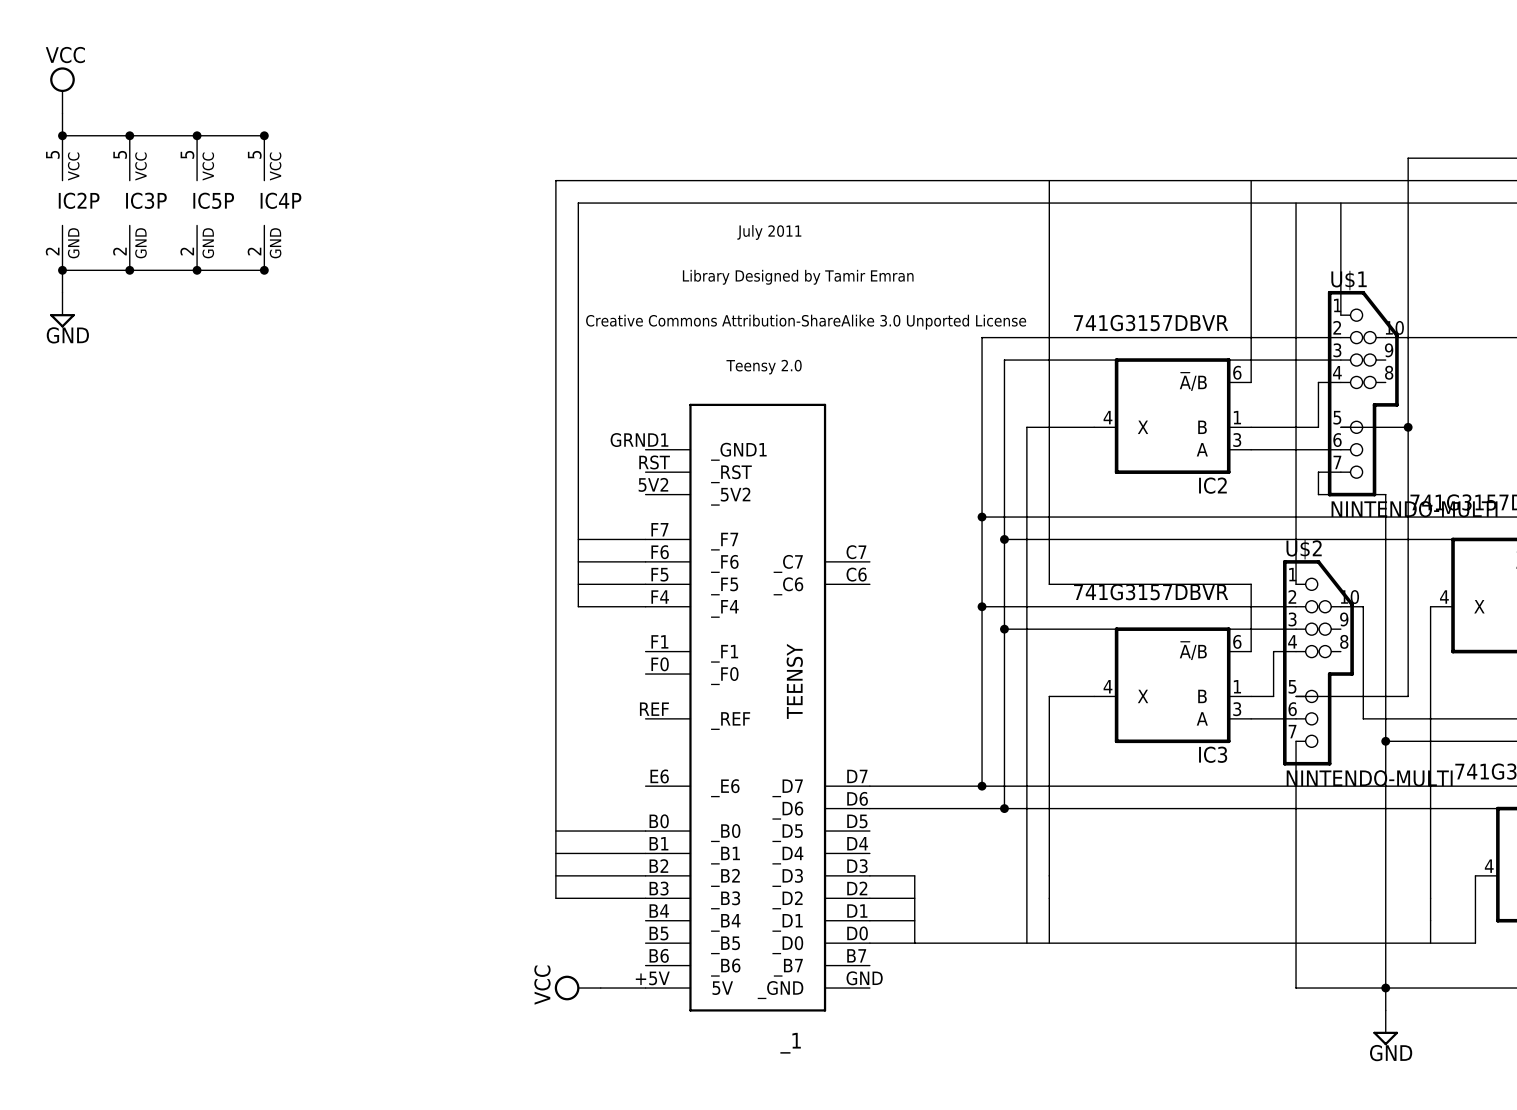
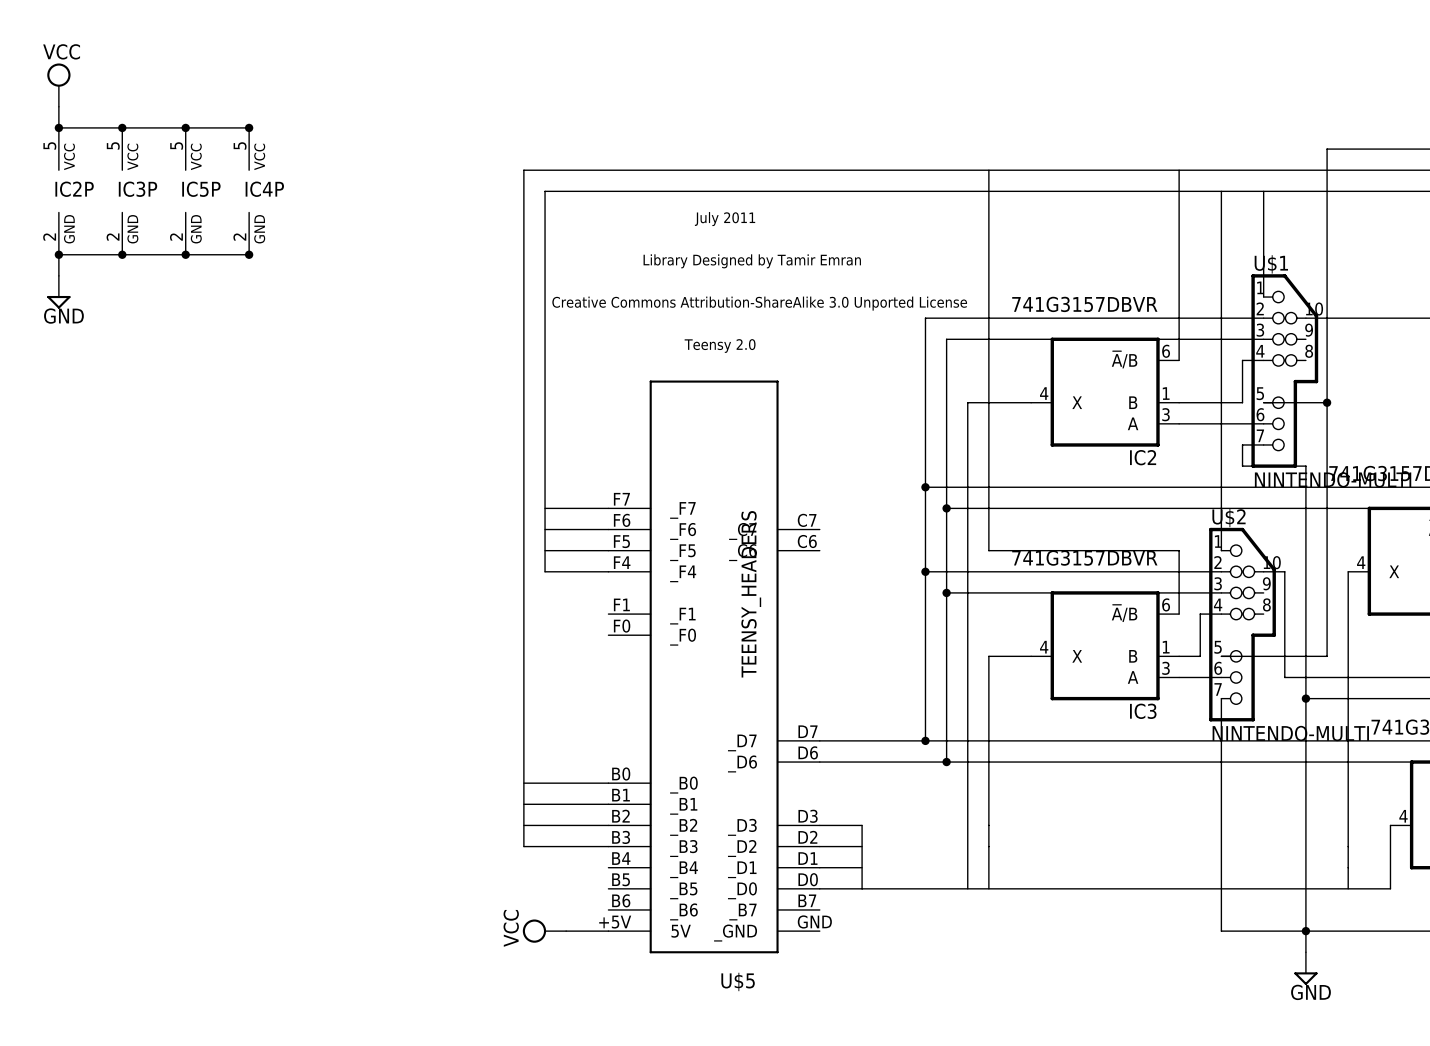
_1: TEENSY (757, 707) -> none
U$5: none -> TEENSY_HEADERS (714, 666)

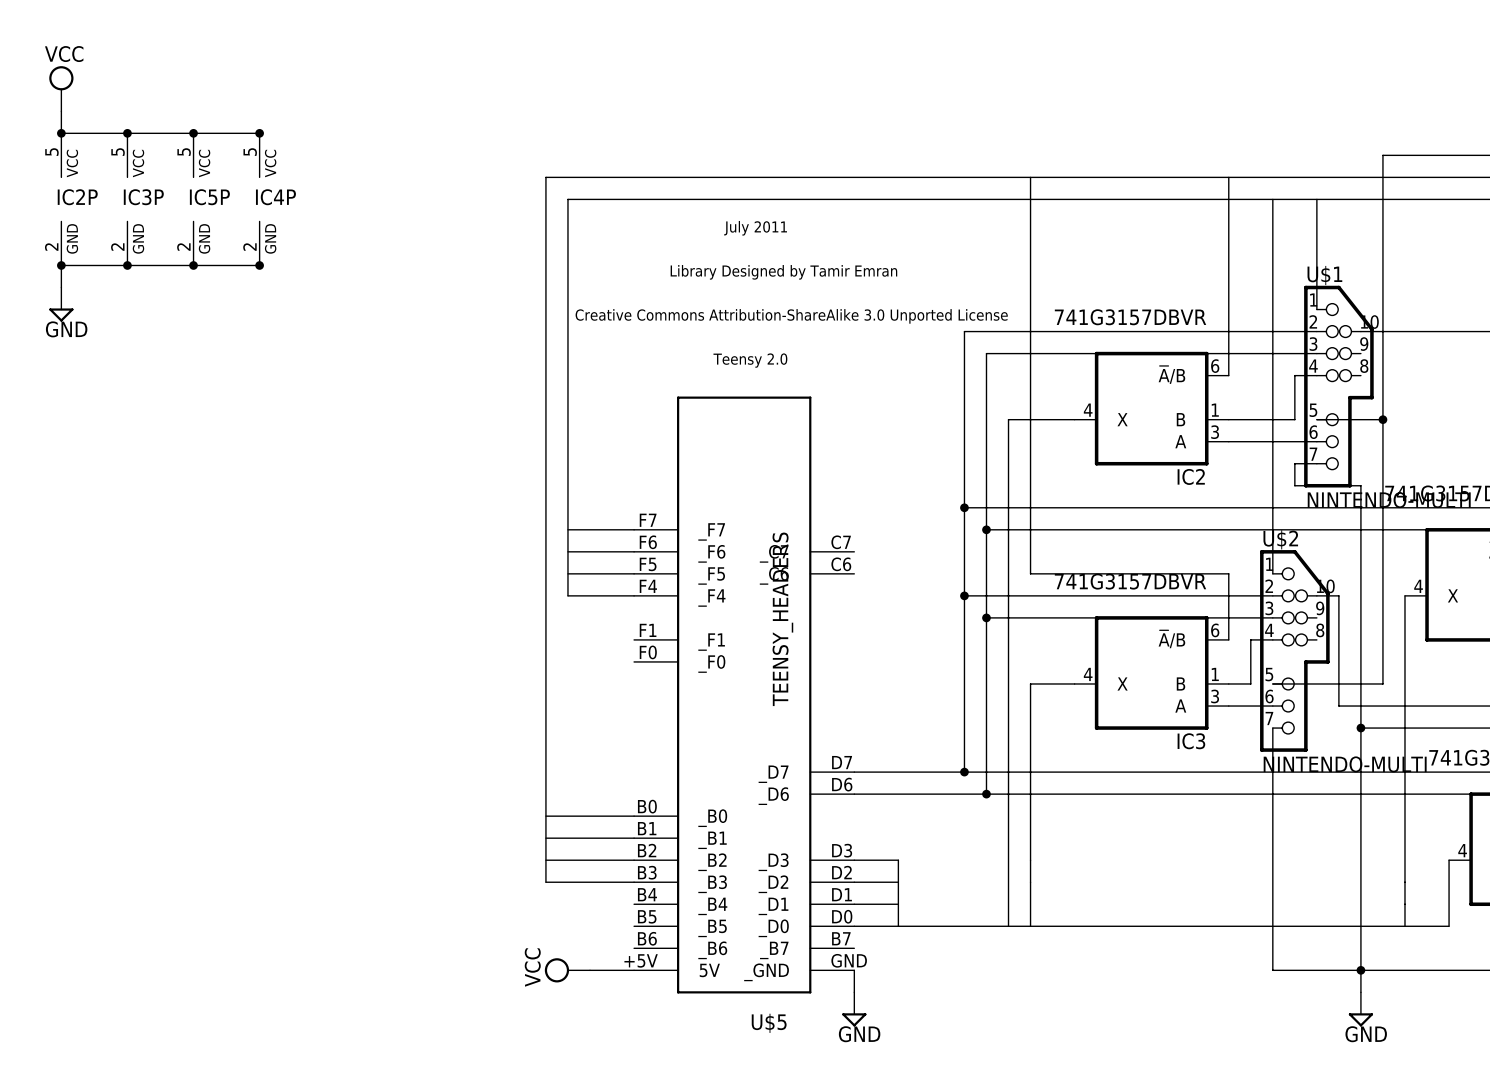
wire: none -> (854, 970) (854, 992)
power symbol: none -> GND (854, 1009)

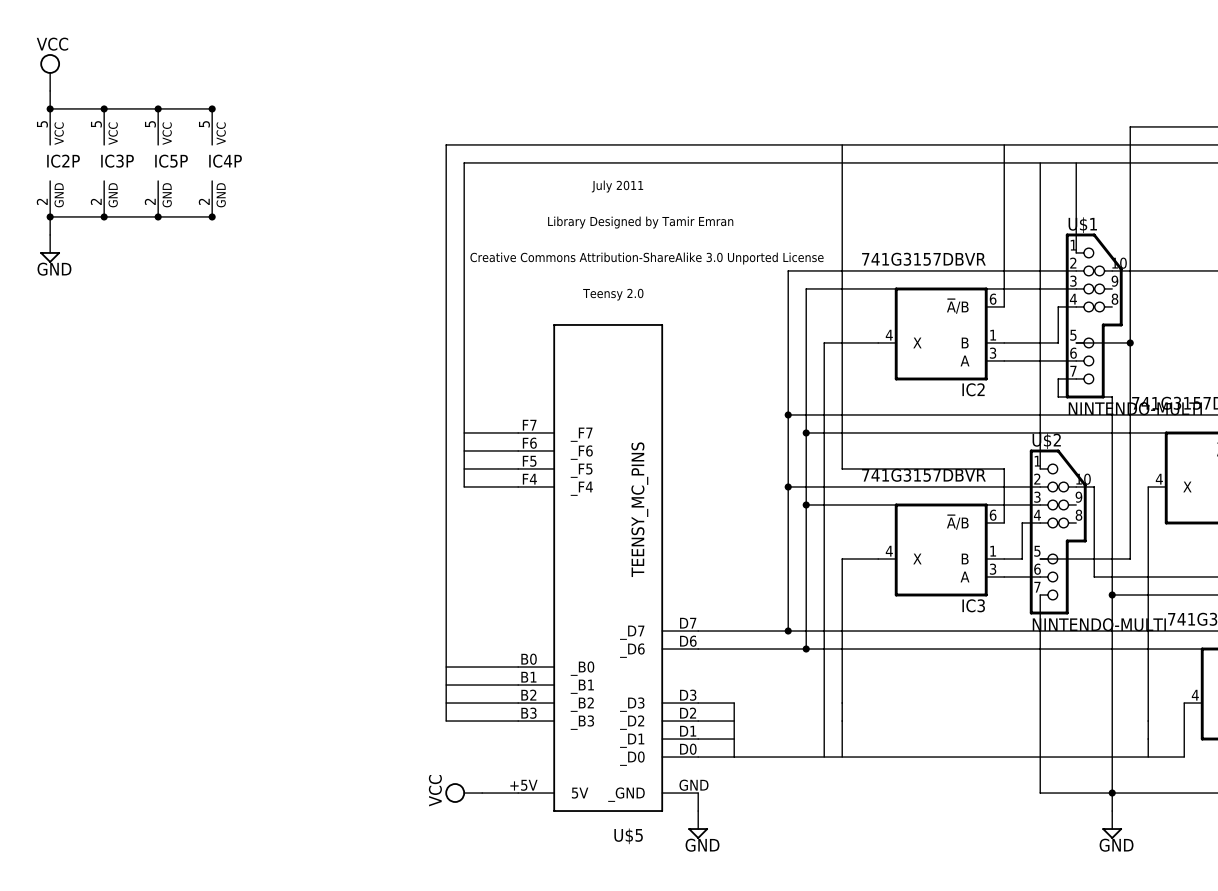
U$5 symbol: [634, 396, 855, 994] -> [518, 324, 699, 812]
U$5 value: TEENSY_HEADERS (782, 619) -> TEENSY_MC_PINS (639, 509)

